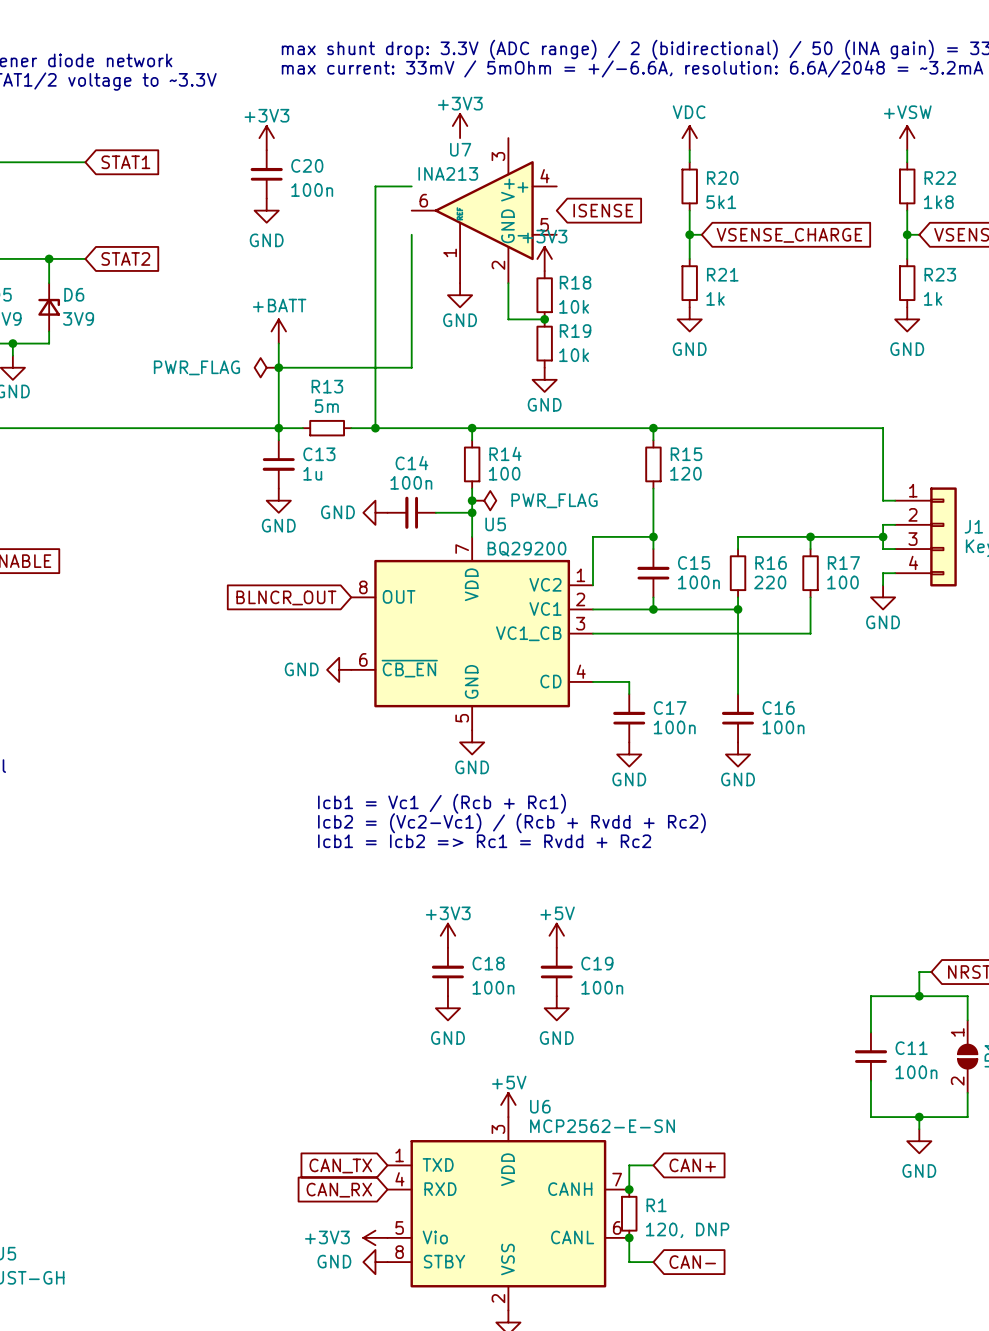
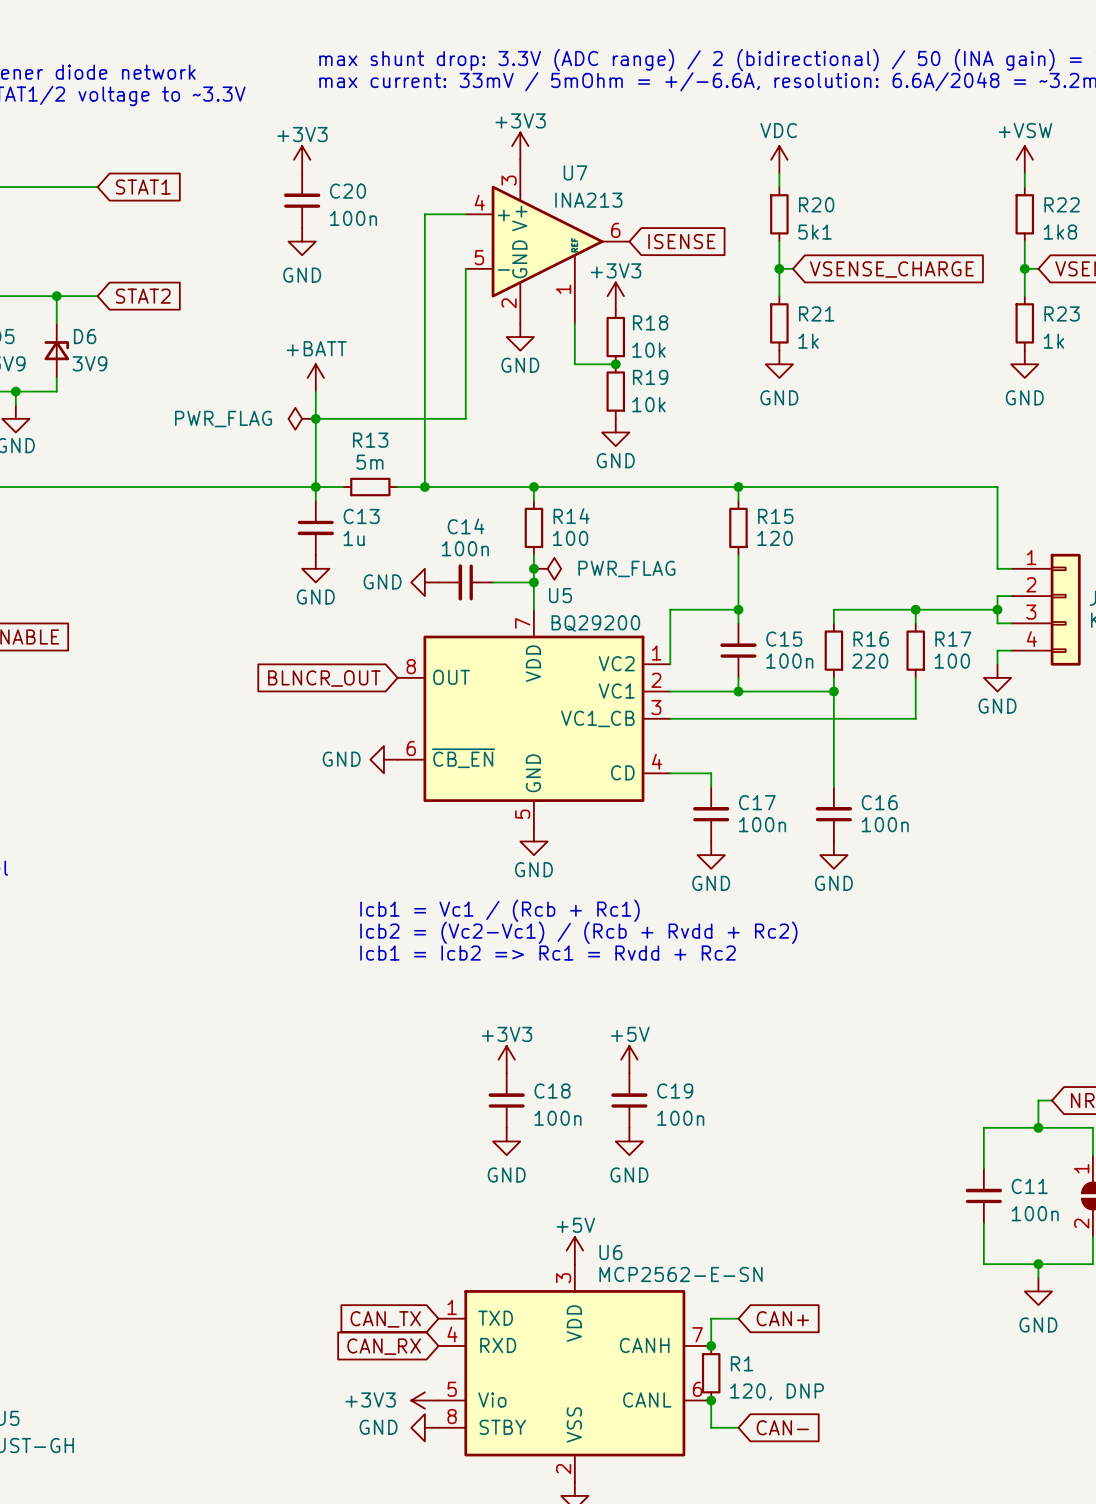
U7 flip: as is (484, 210) -> left-right (547, 241)

